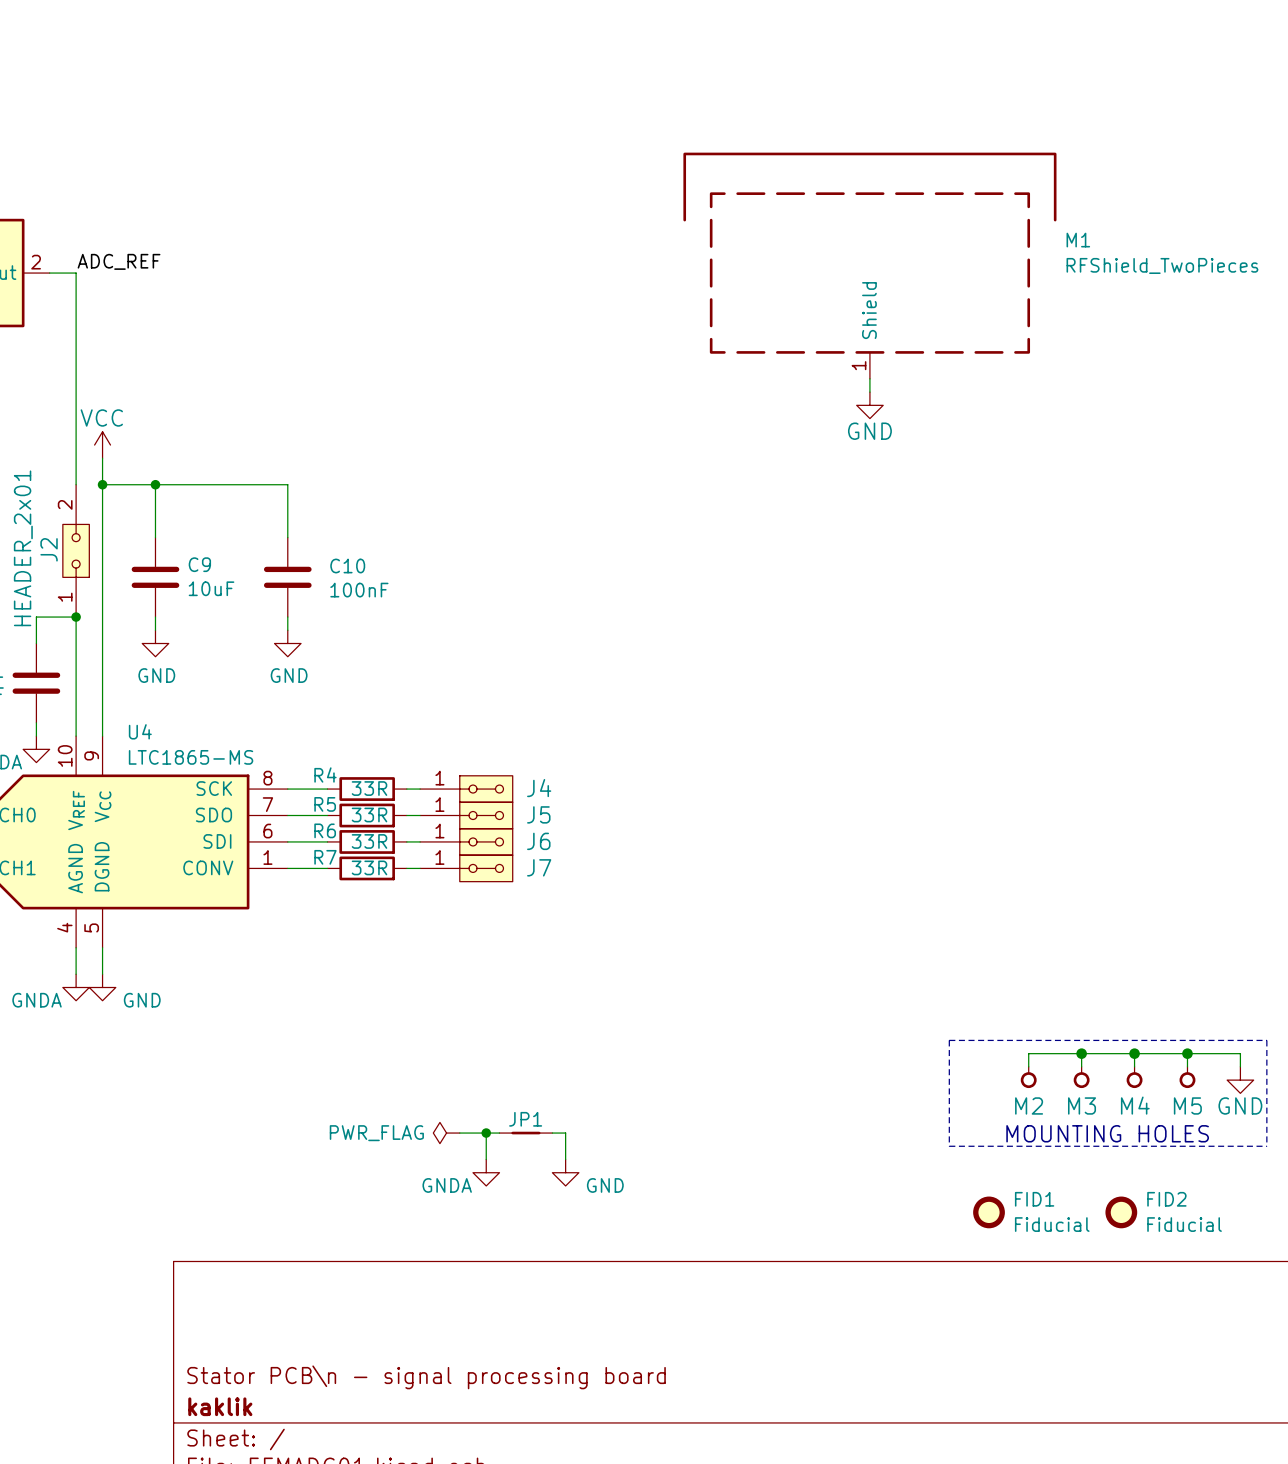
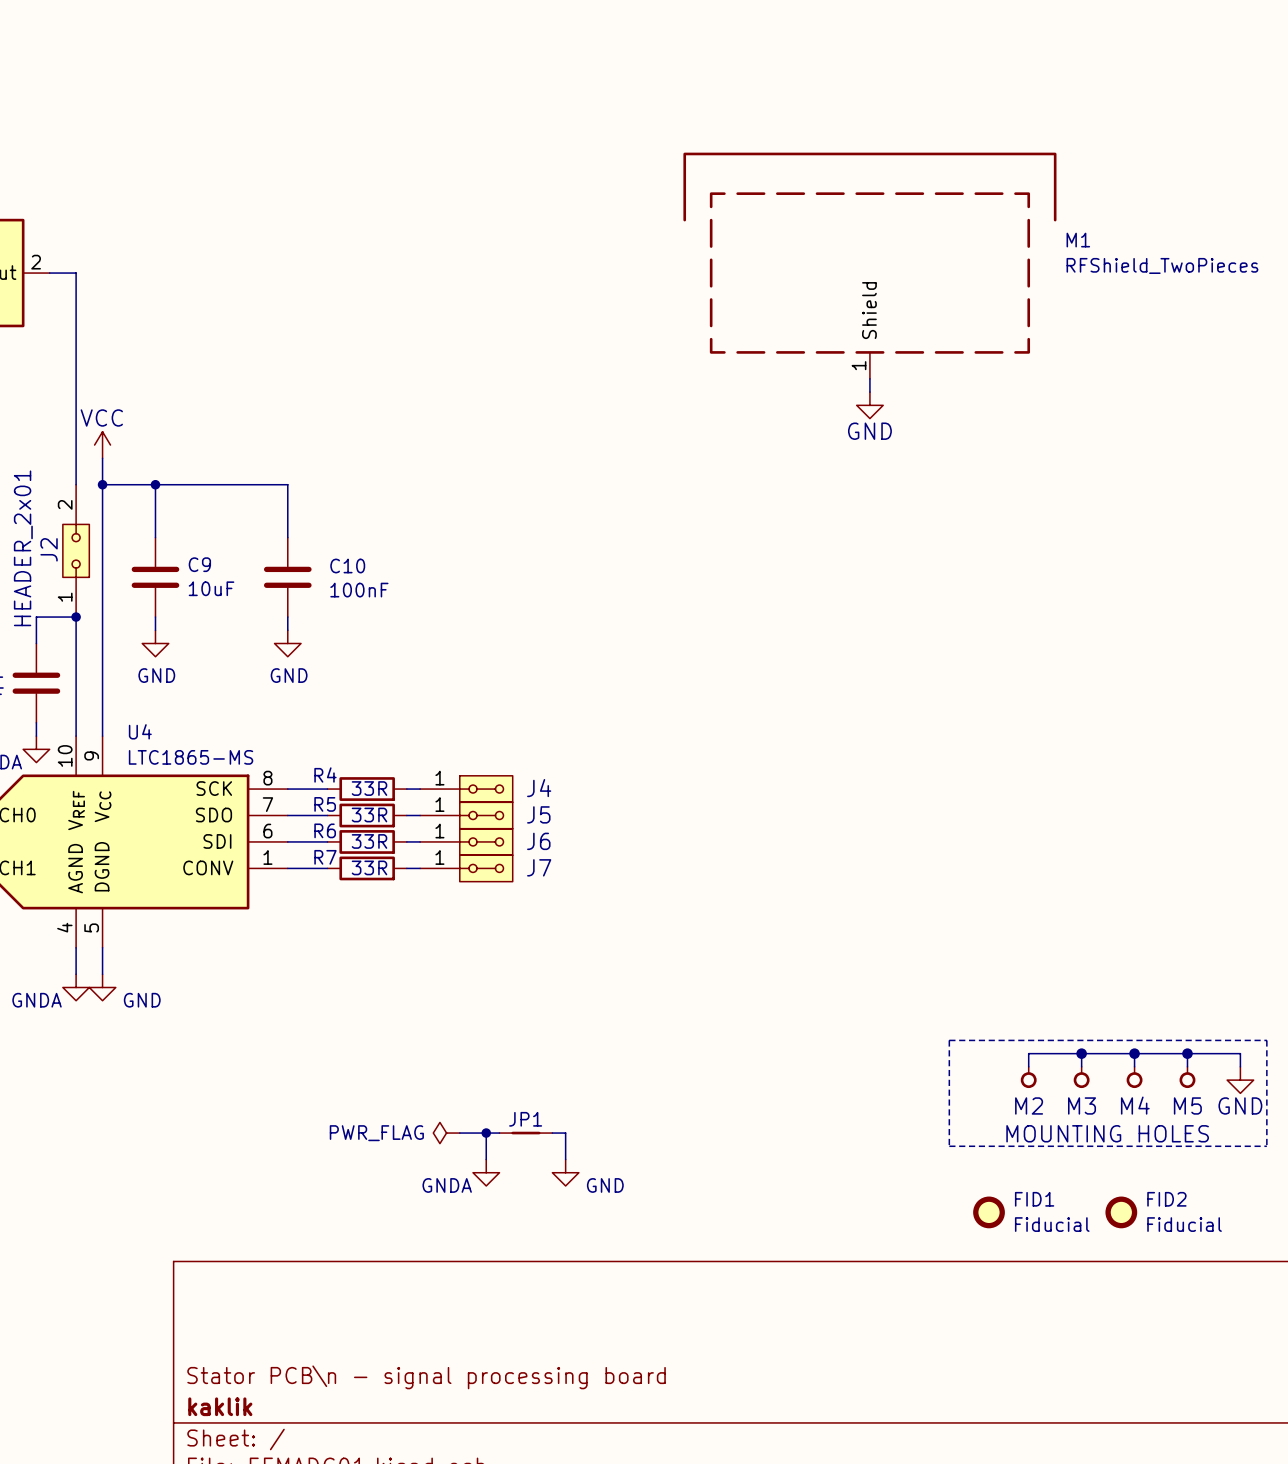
label: ADC_REF (119, 261) -> none

